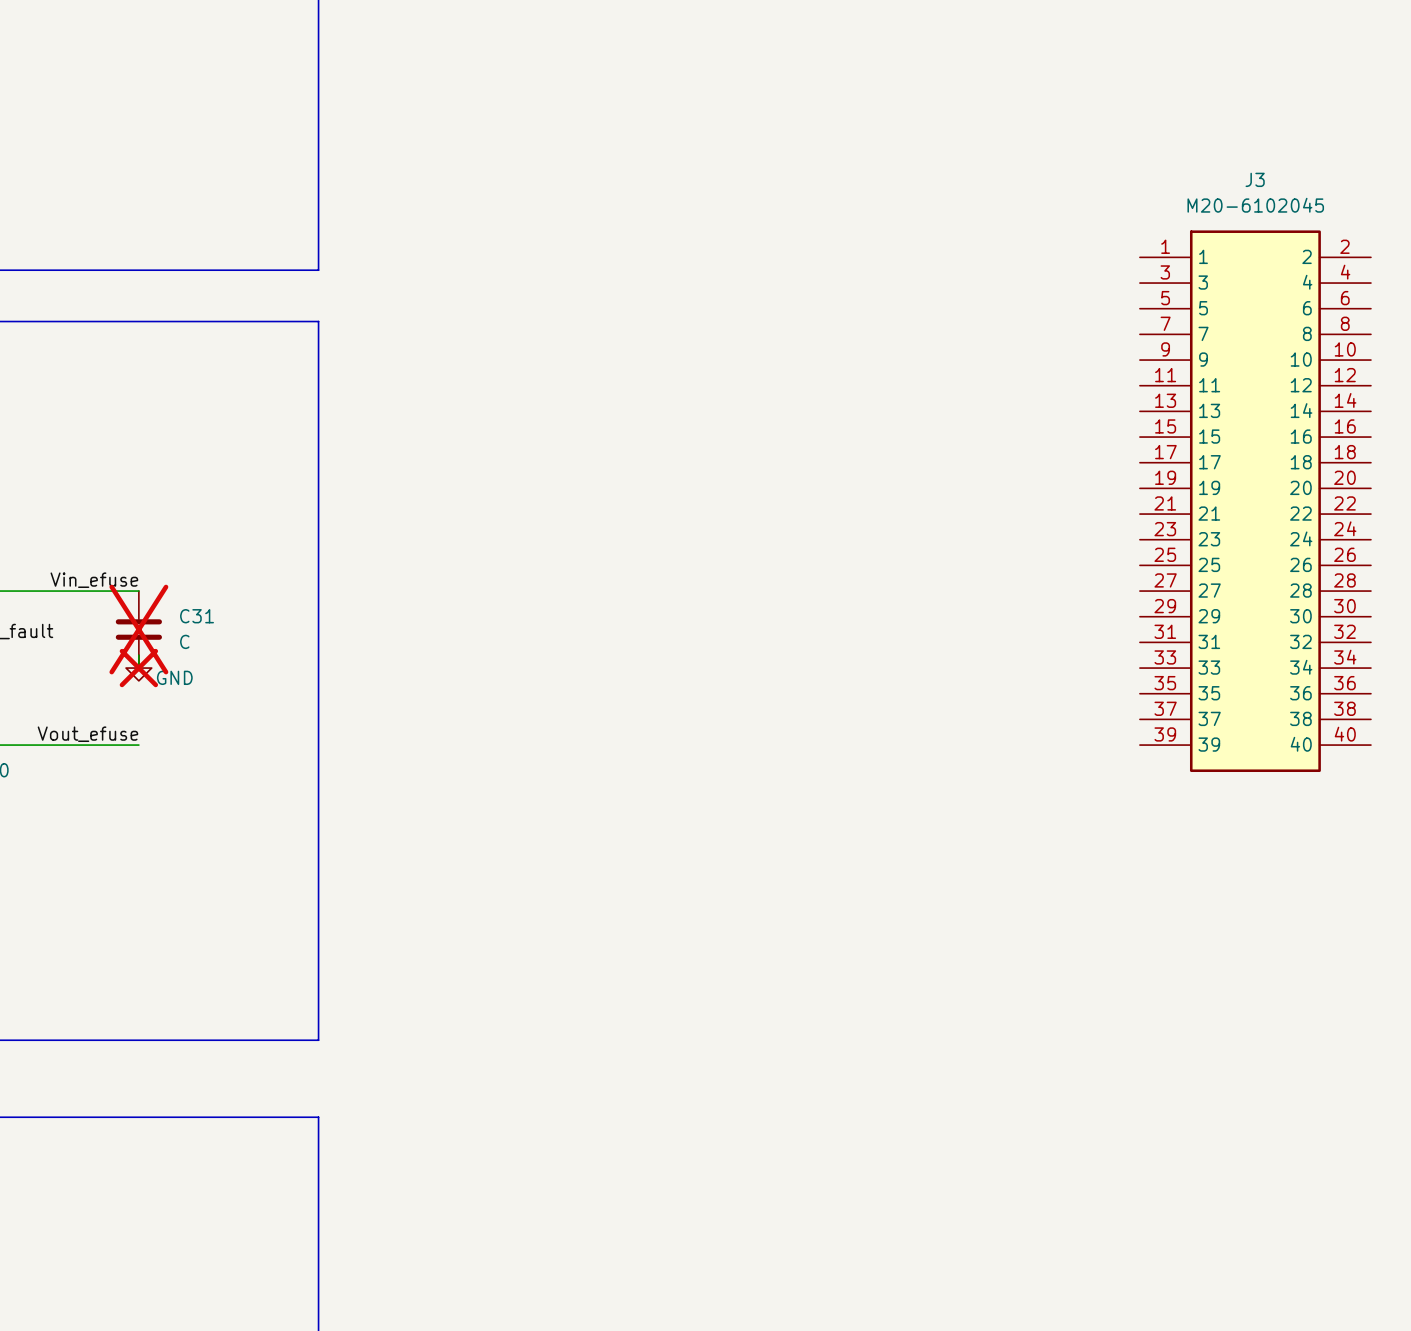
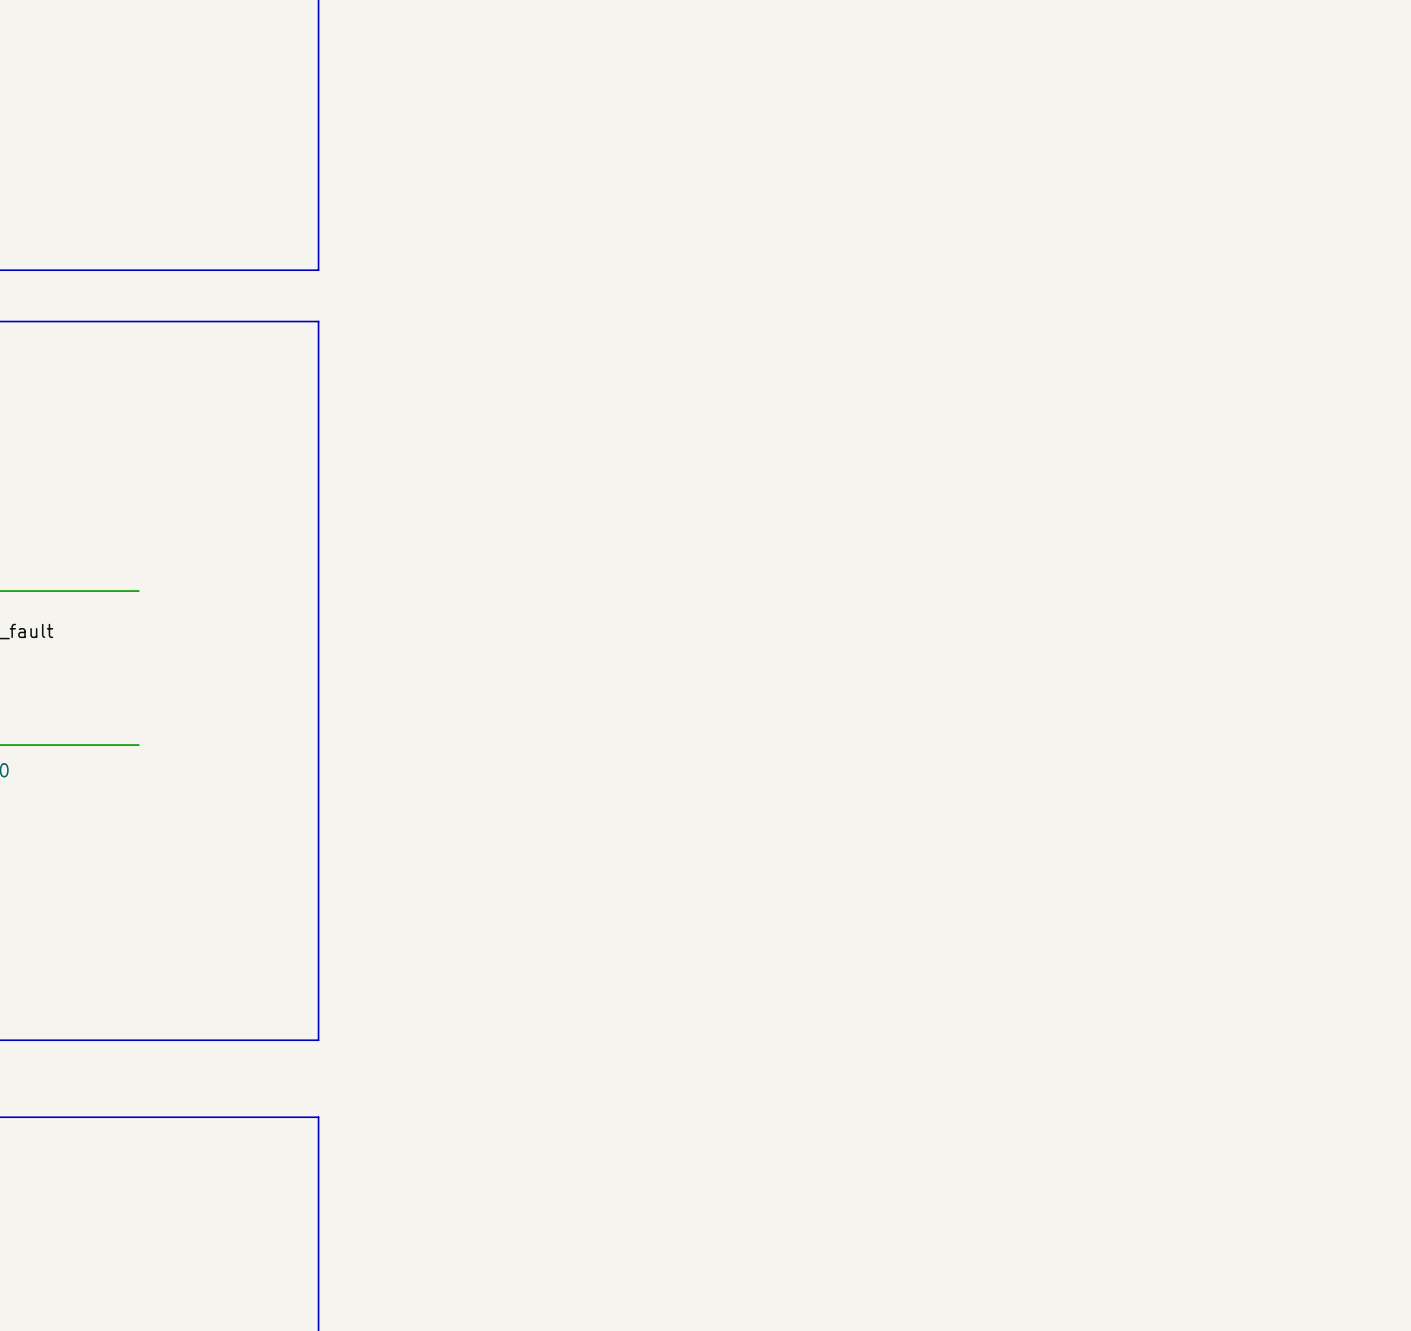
J3: M20-6102045 (1255, 501) -> none
label: Vin_efuse (94, 580) -> none
C31: C (138, 629) -> none
wire: (138, 655) (138, 668) -> none
power symbol: GND (138, 668) -> none
label: Vout_efuse (87, 734) -> none

